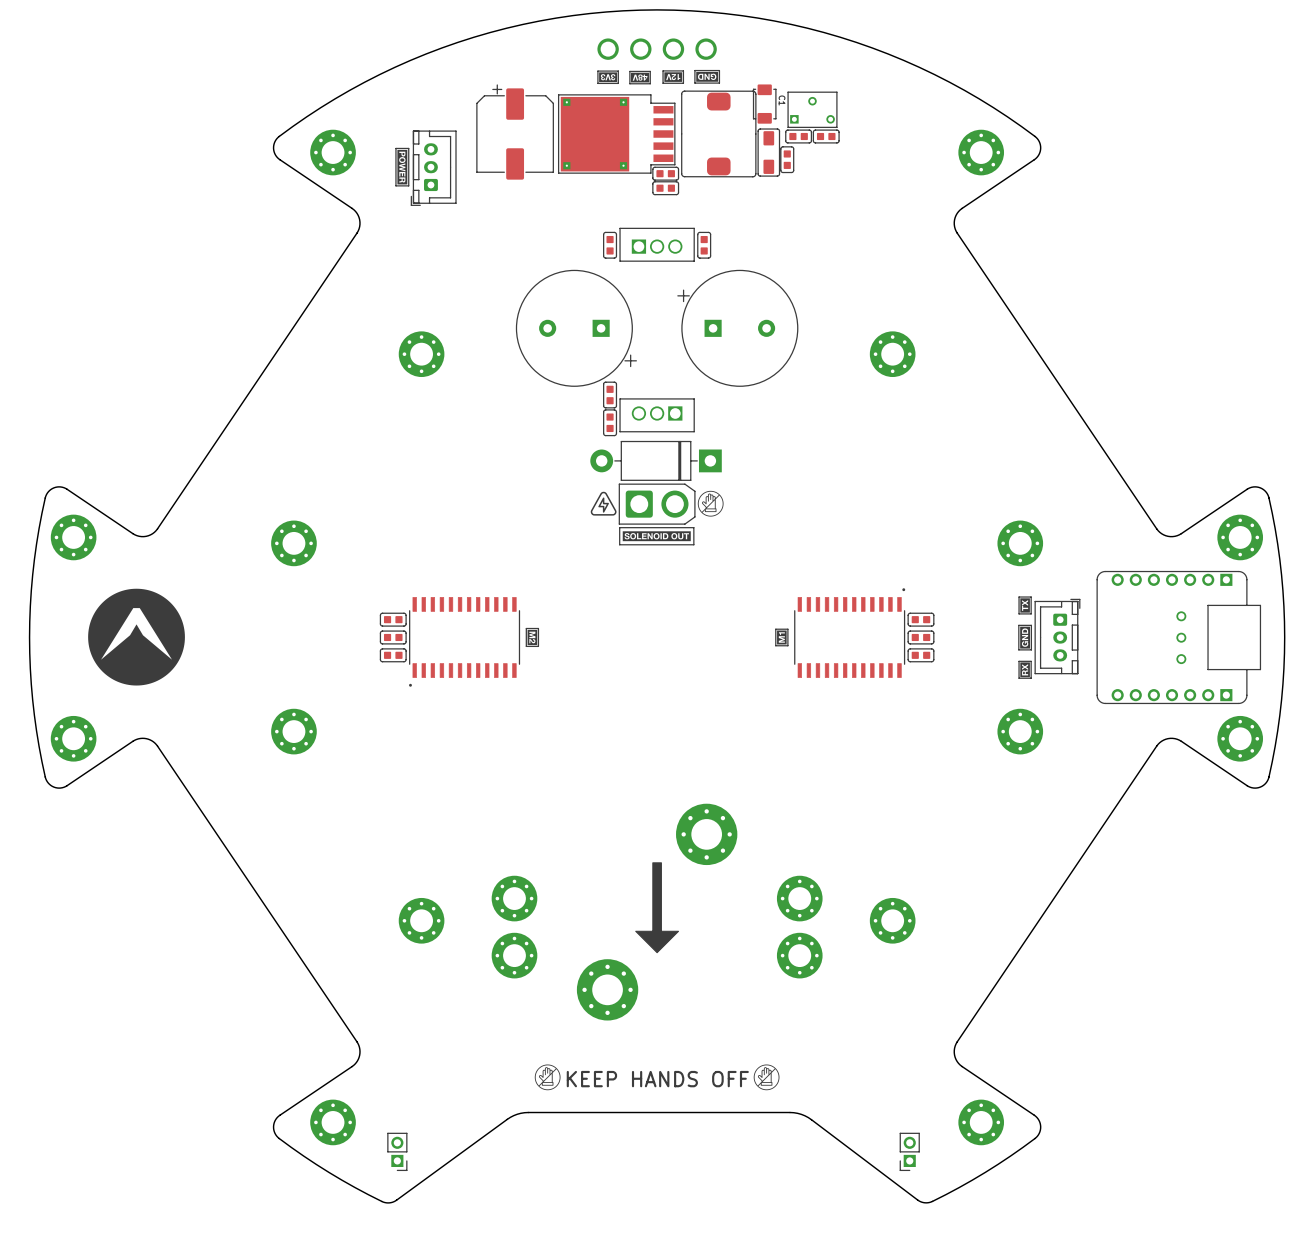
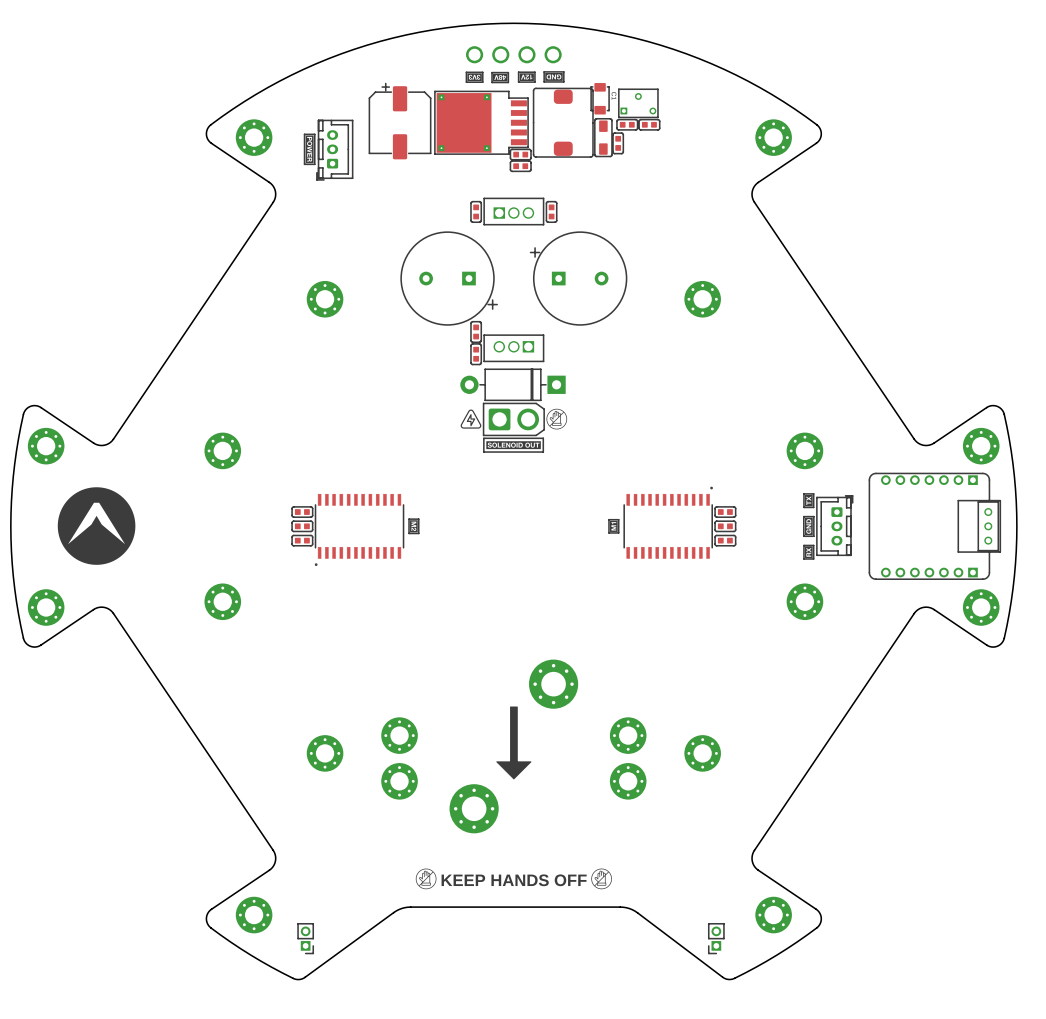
part footprint: [1176, 611, 1187, 665] -> [869, 473, 1001, 580]
part: (1178, 637) -> none
part: none -> (988, 526)

